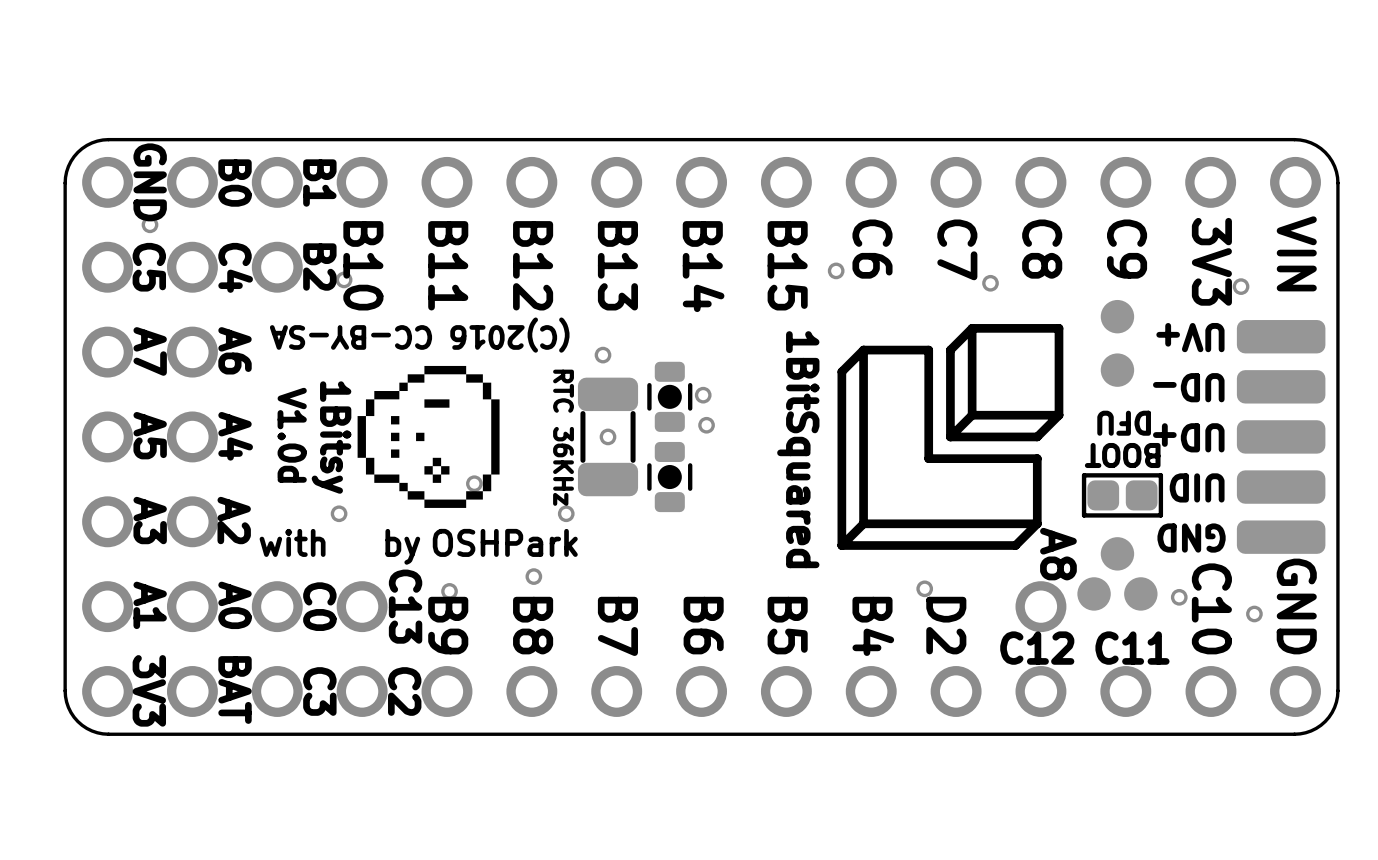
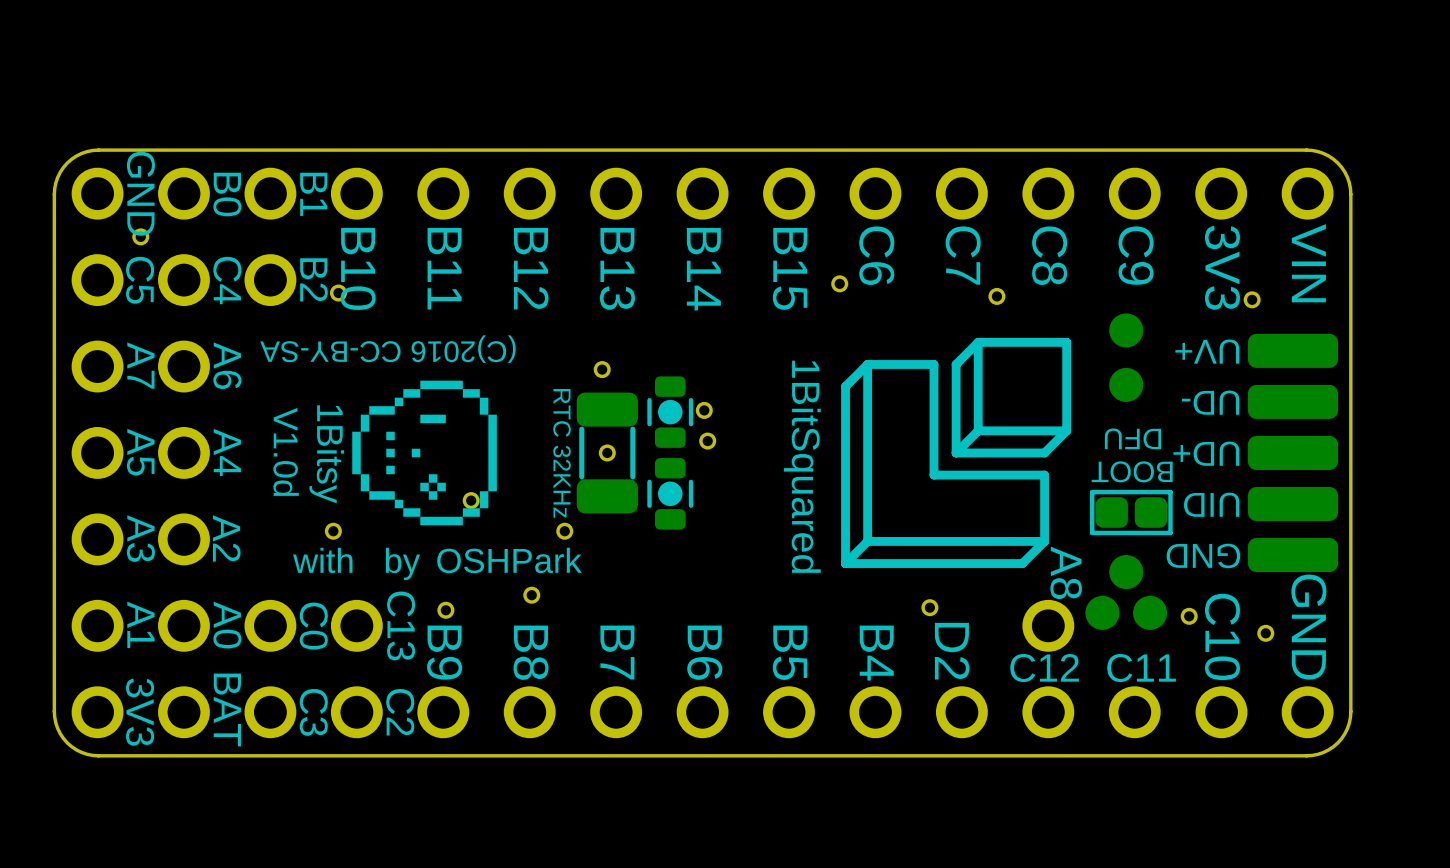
text: RTC 36KHz (563, 437) -> RTC 32KHz (562, 453)

